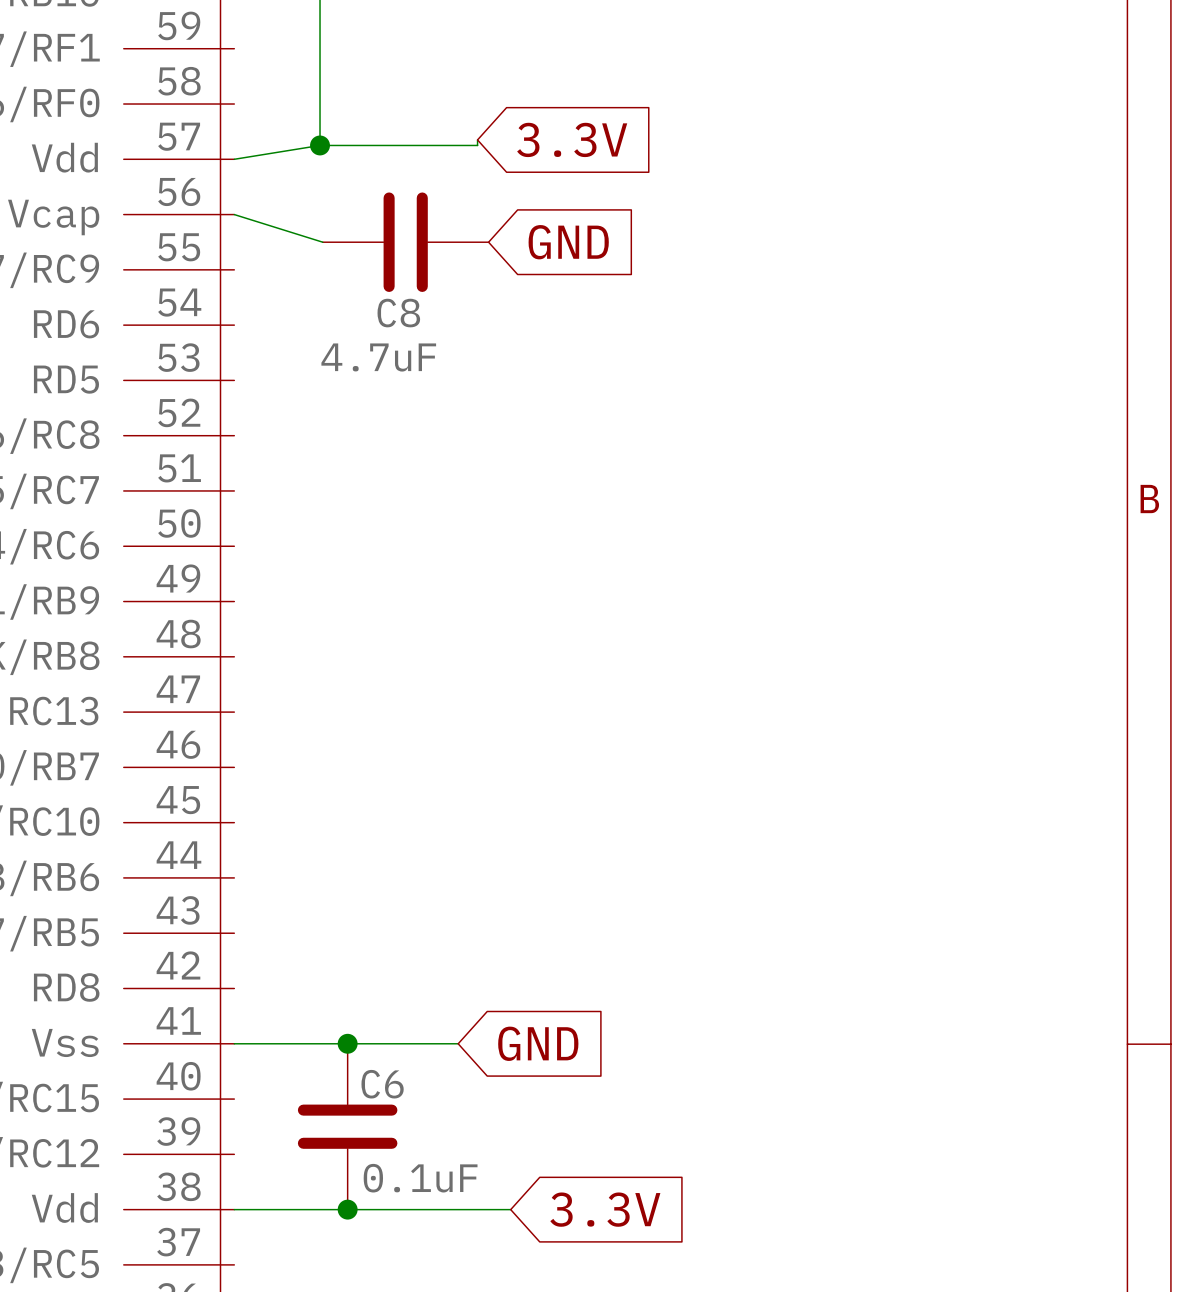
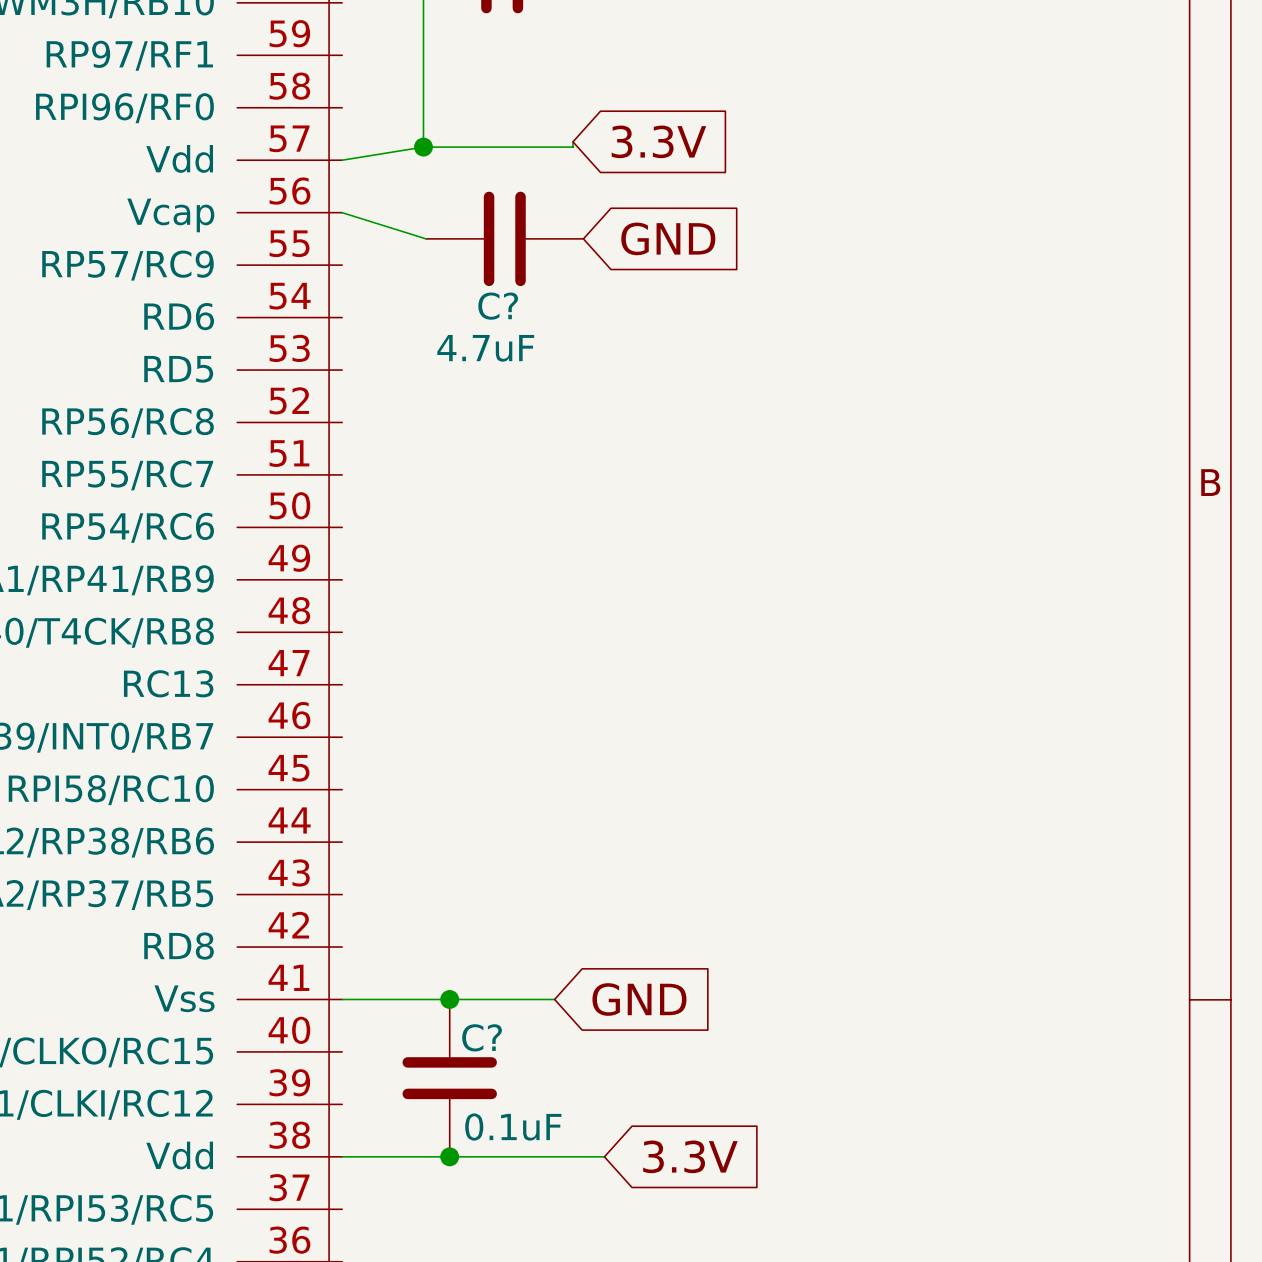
C8 name: C8 (398, 313) -> C? (498, 306)
C6 name: C6 (382, 1084) -> C? (482, 1037)

